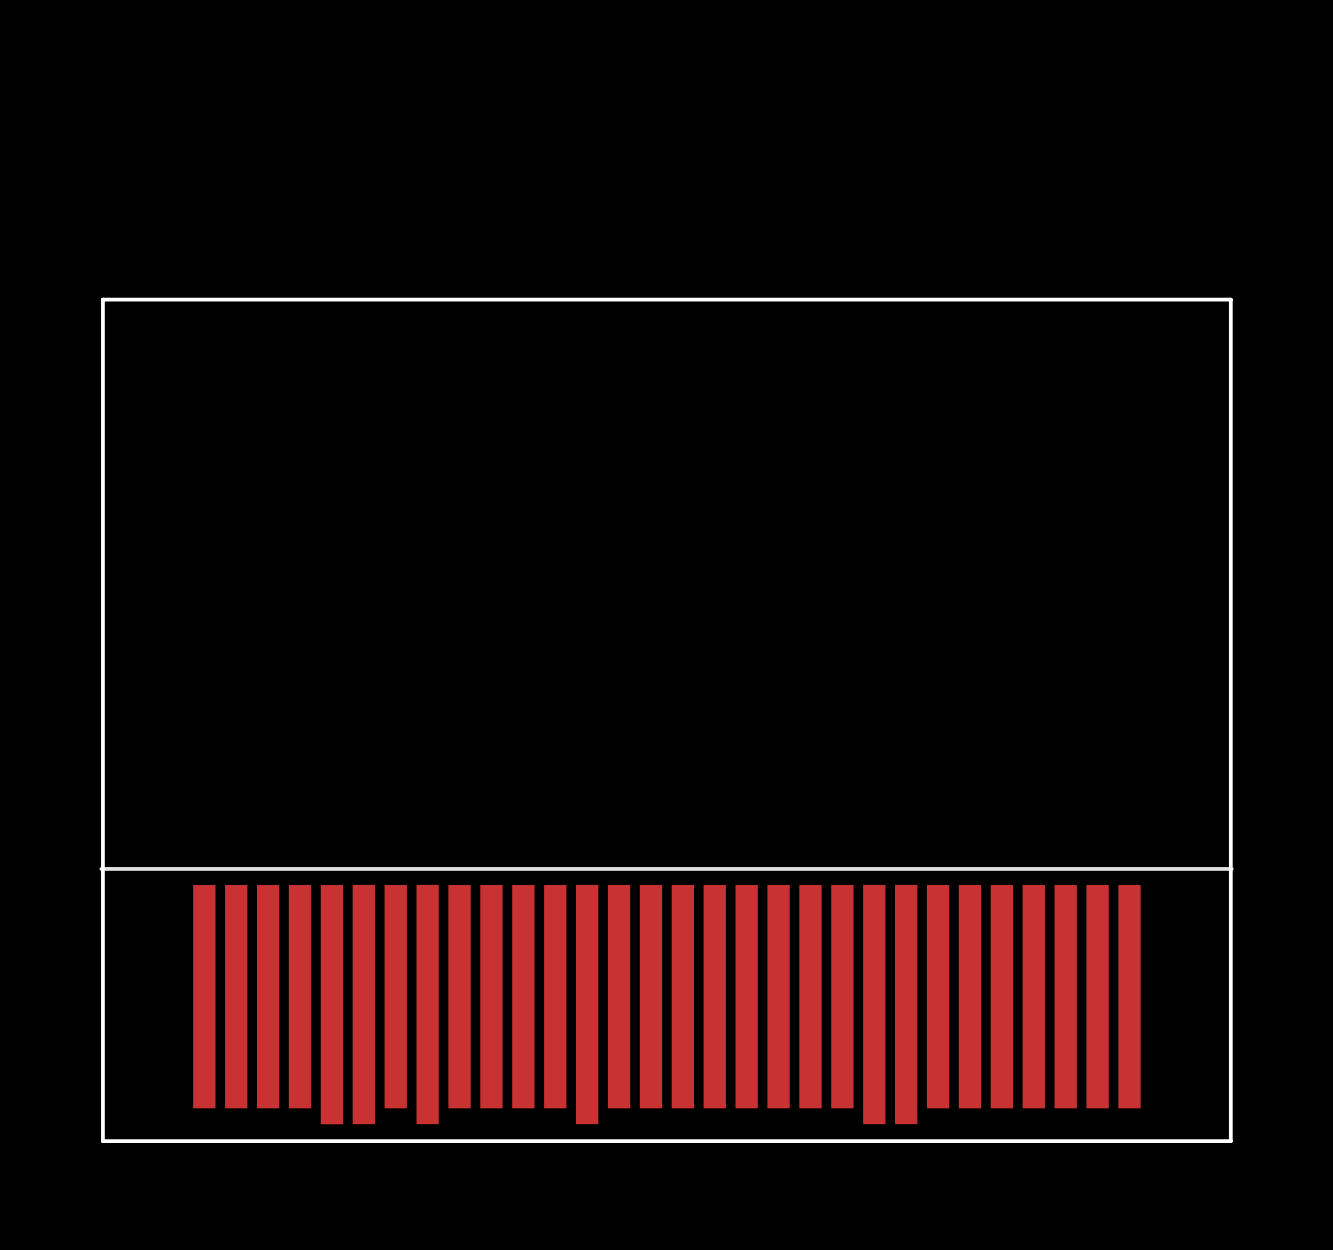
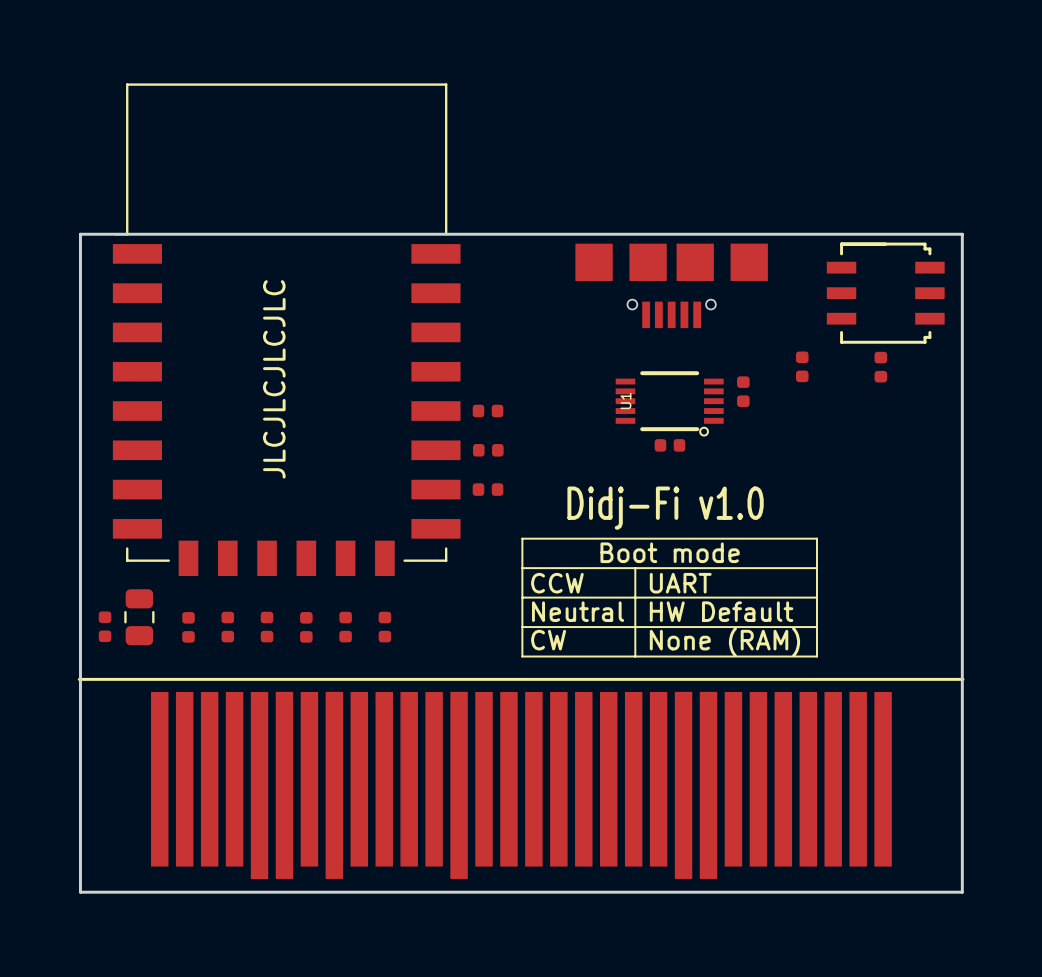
part: none -> (671, 285)
part: none -> (885, 293)
part: none -> (286, 329)
part: none -> (802, 366)
part: none -> (880, 367)
text: none -> JLCJLCJLCJLC (274, 379)
part: none -> (743, 391)
U1: none -> (669, 403)
part: none -> (488, 411)
part: none -> (669, 445)
part: none -> (488, 450)
part: none -> (488, 489)
text: none -> Didj-Fi v1.0 (665, 508)
line: none -> (522, 538) (816, 538) (816, 656) (522, 656) (522, 538)
text: none -> Boot mode (670, 552)
line: none -> (522, 568) (816, 568)
line: none -> (635, 568) (635, 656)
text: none -> CCW (557, 583)
text: none -> UART (680, 583)
line: none -> (522, 597) (816, 597)
text: none -> Neutral (578, 611)
text: none -> HW Default (721, 611)
part: none -> (139, 617)
part: none -> (105, 626)
part: none -> (188, 627)
part: none -> (227, 627)
part: none -> (267, 627)
part: none -> (306, 627)
part: none -> (345, 627)
part: none -> (384, 627)
line: none -> (522, 627) (816, 627)
text: none -> CW (548, 640)
text: none -> None (RAM) (724, 642)

